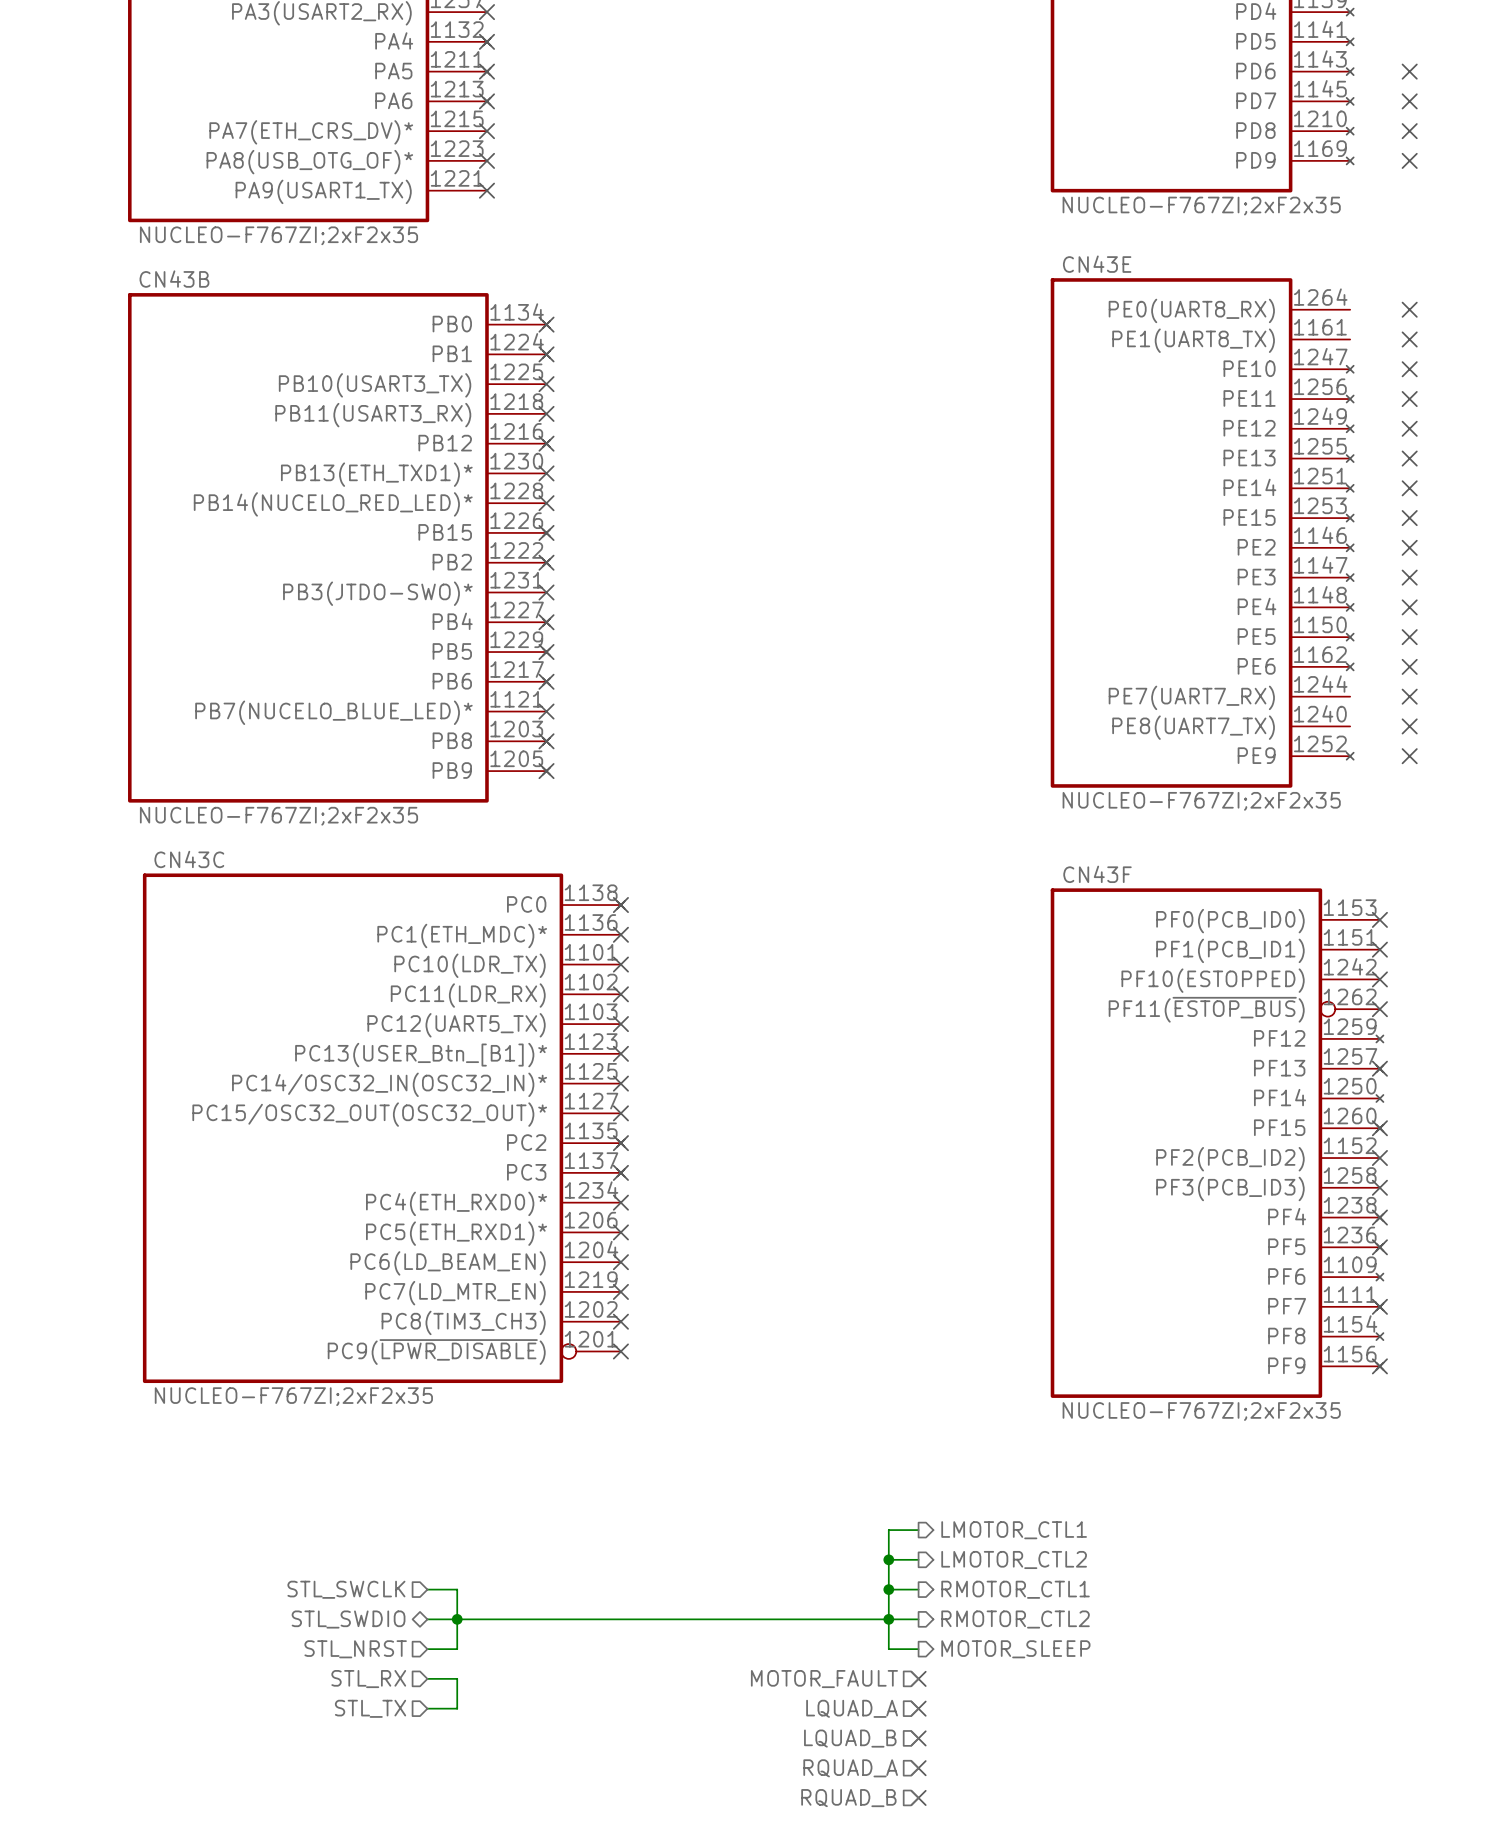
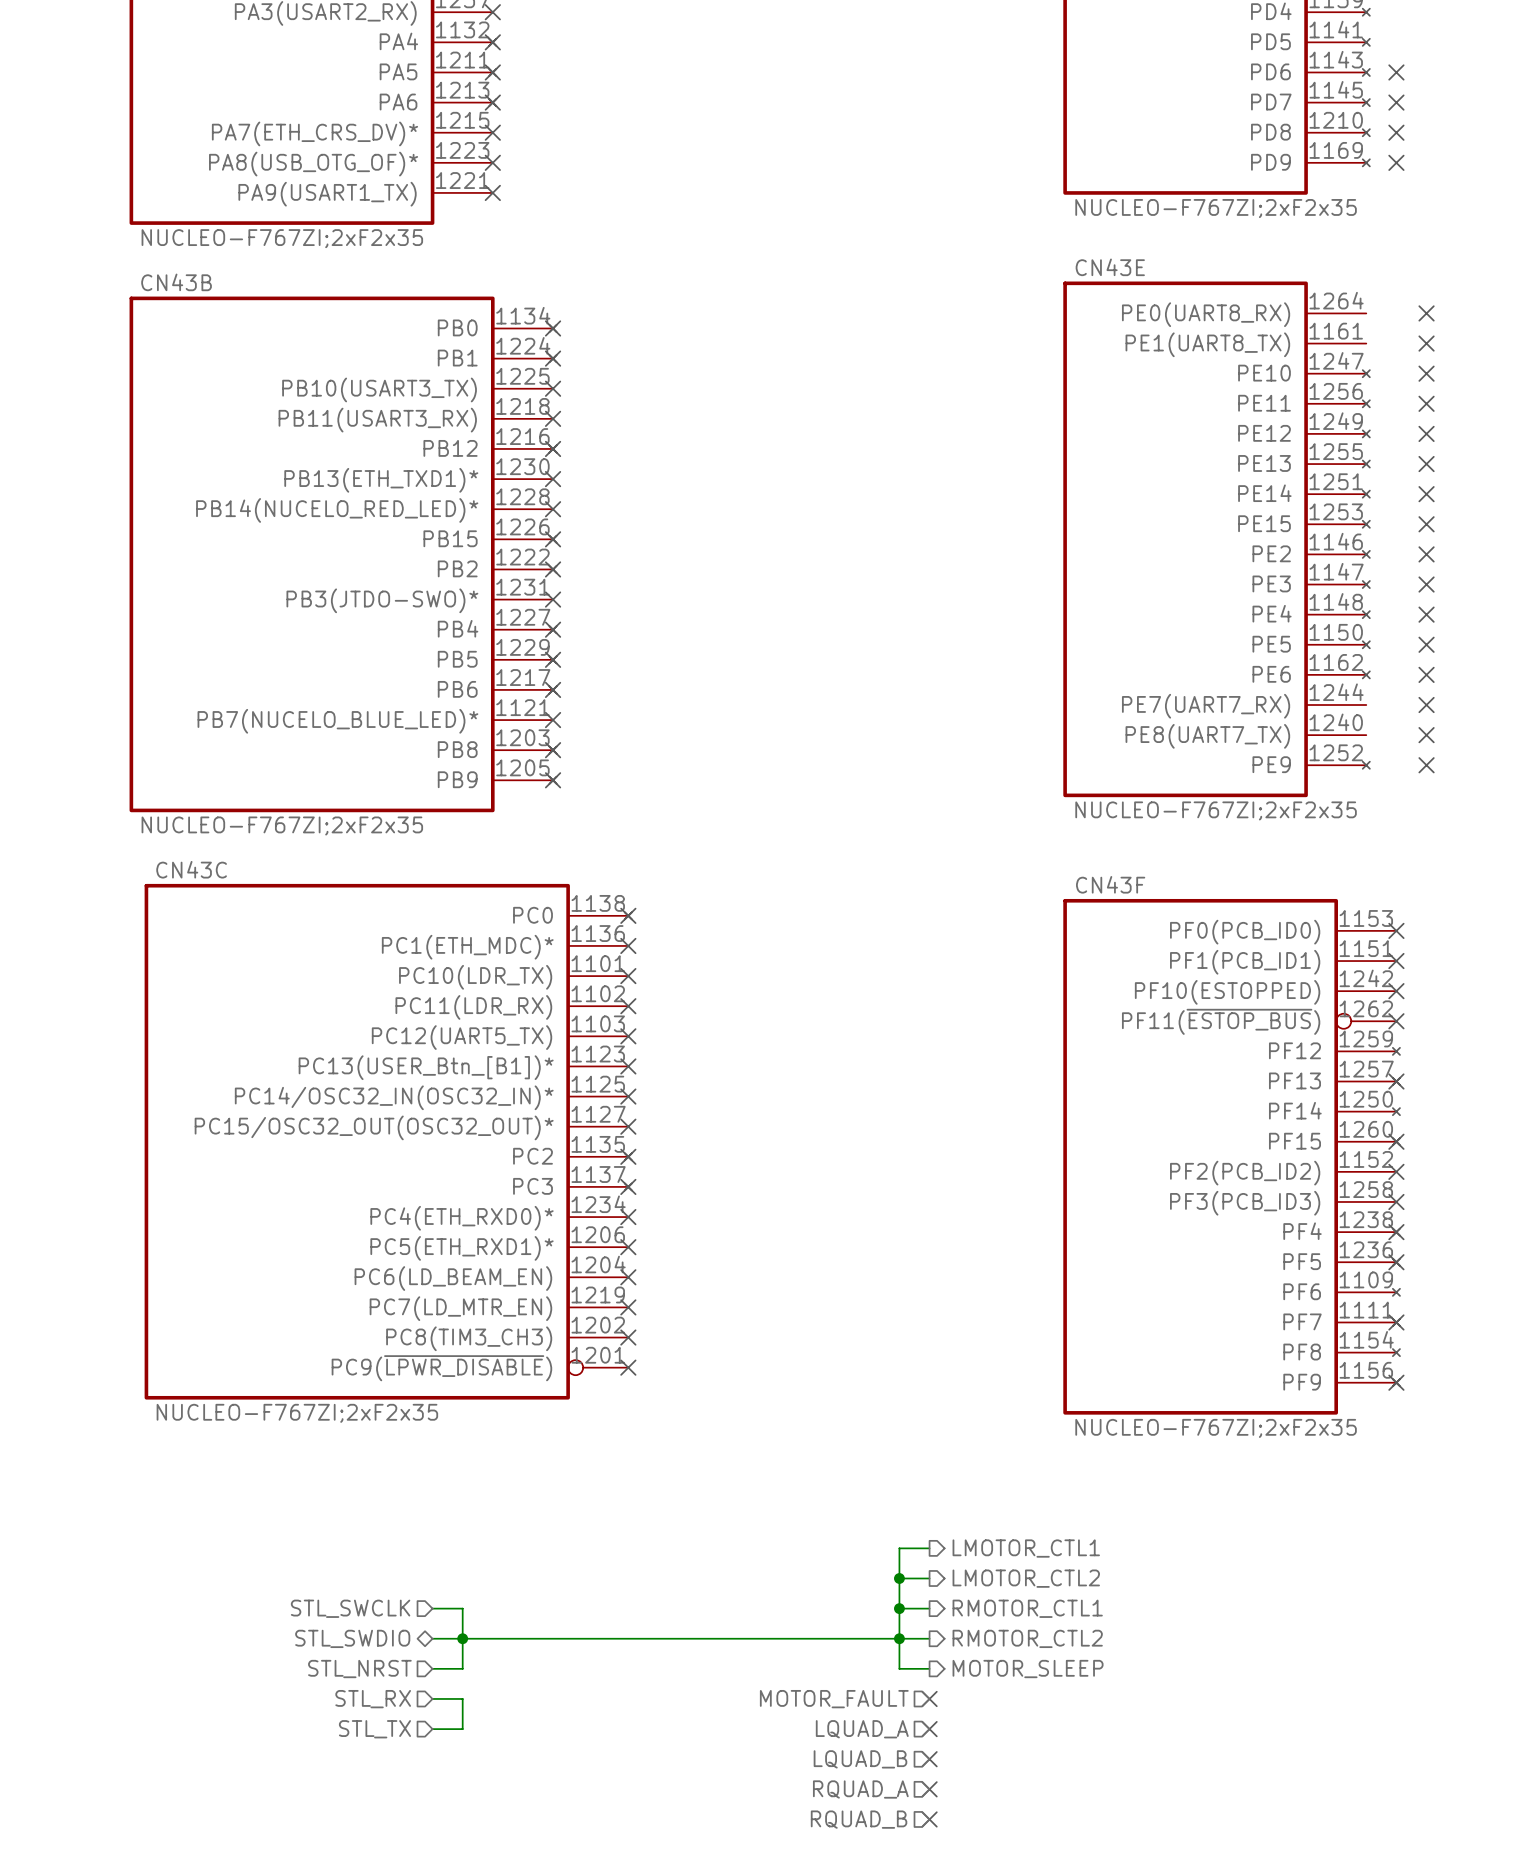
no-connect mark: none -> (1396, 72)
no-connect mark: (1409, 71) -> none
no-connect mark: none -> (1396, 102)
no-connect mark: (1409, 101) -> none
no-connect mark: none -> (1396, 132)
no-connect mark: (1409, 131) -> none
no-connect mark: none -> (1396, 162)
no-connect mark: (1409, 160) -> none

